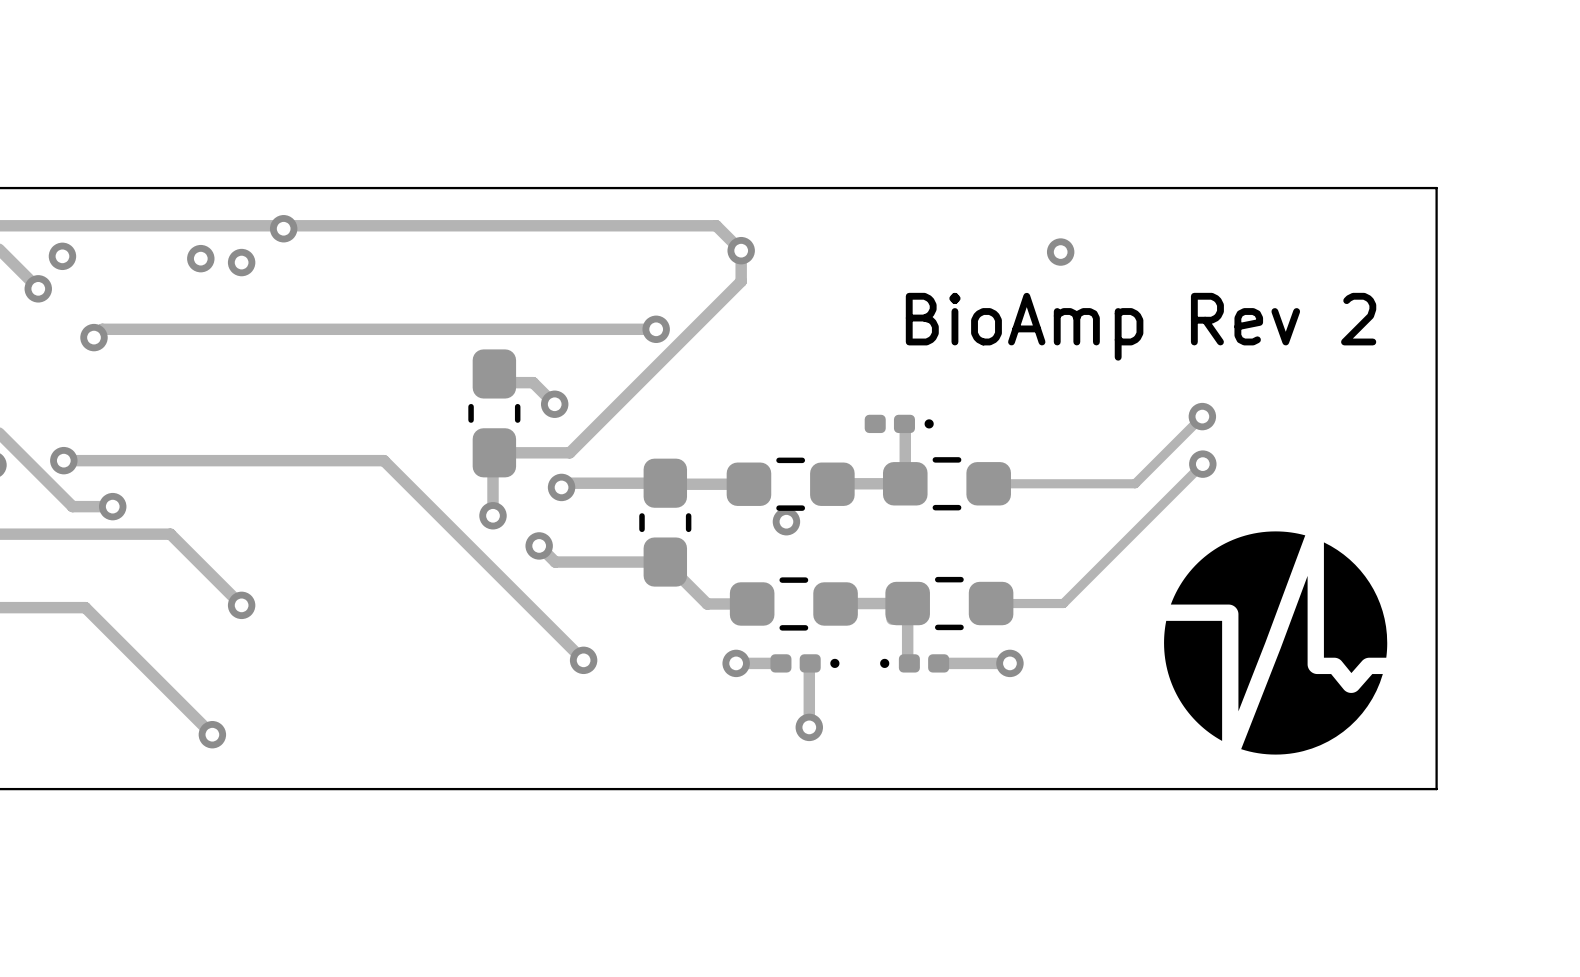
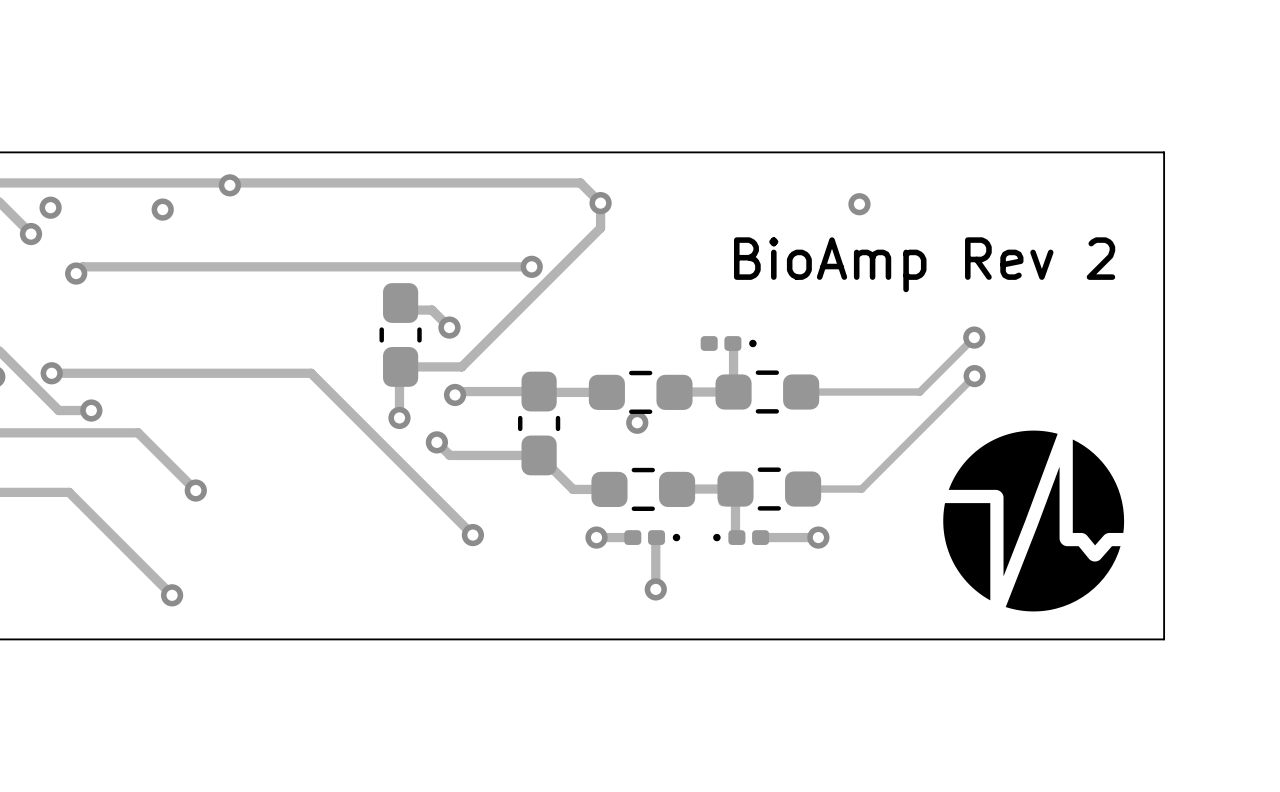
via: (241, 262) -> none

